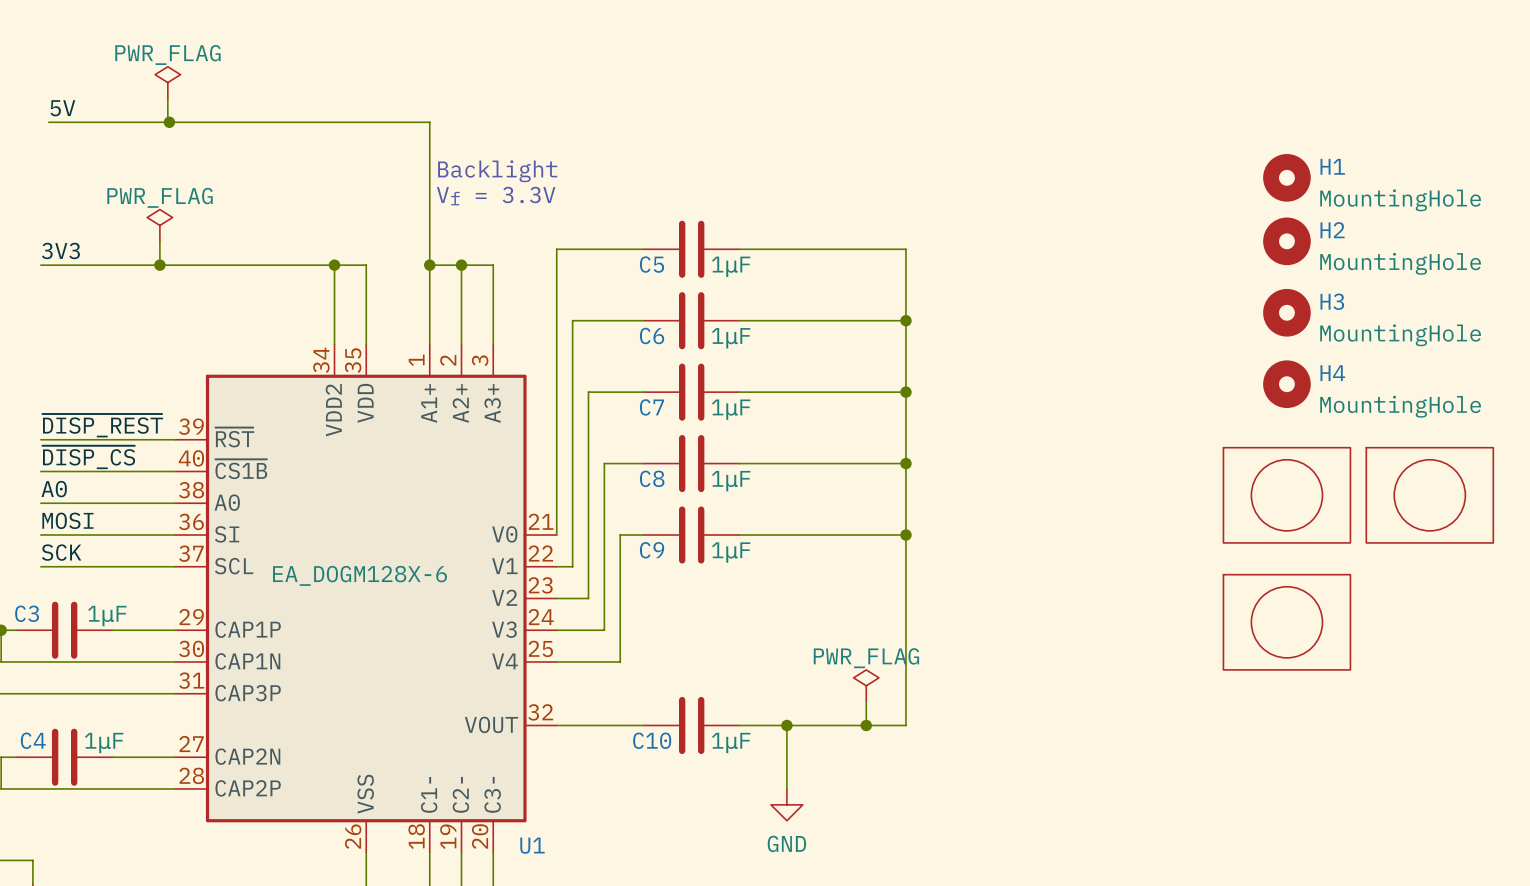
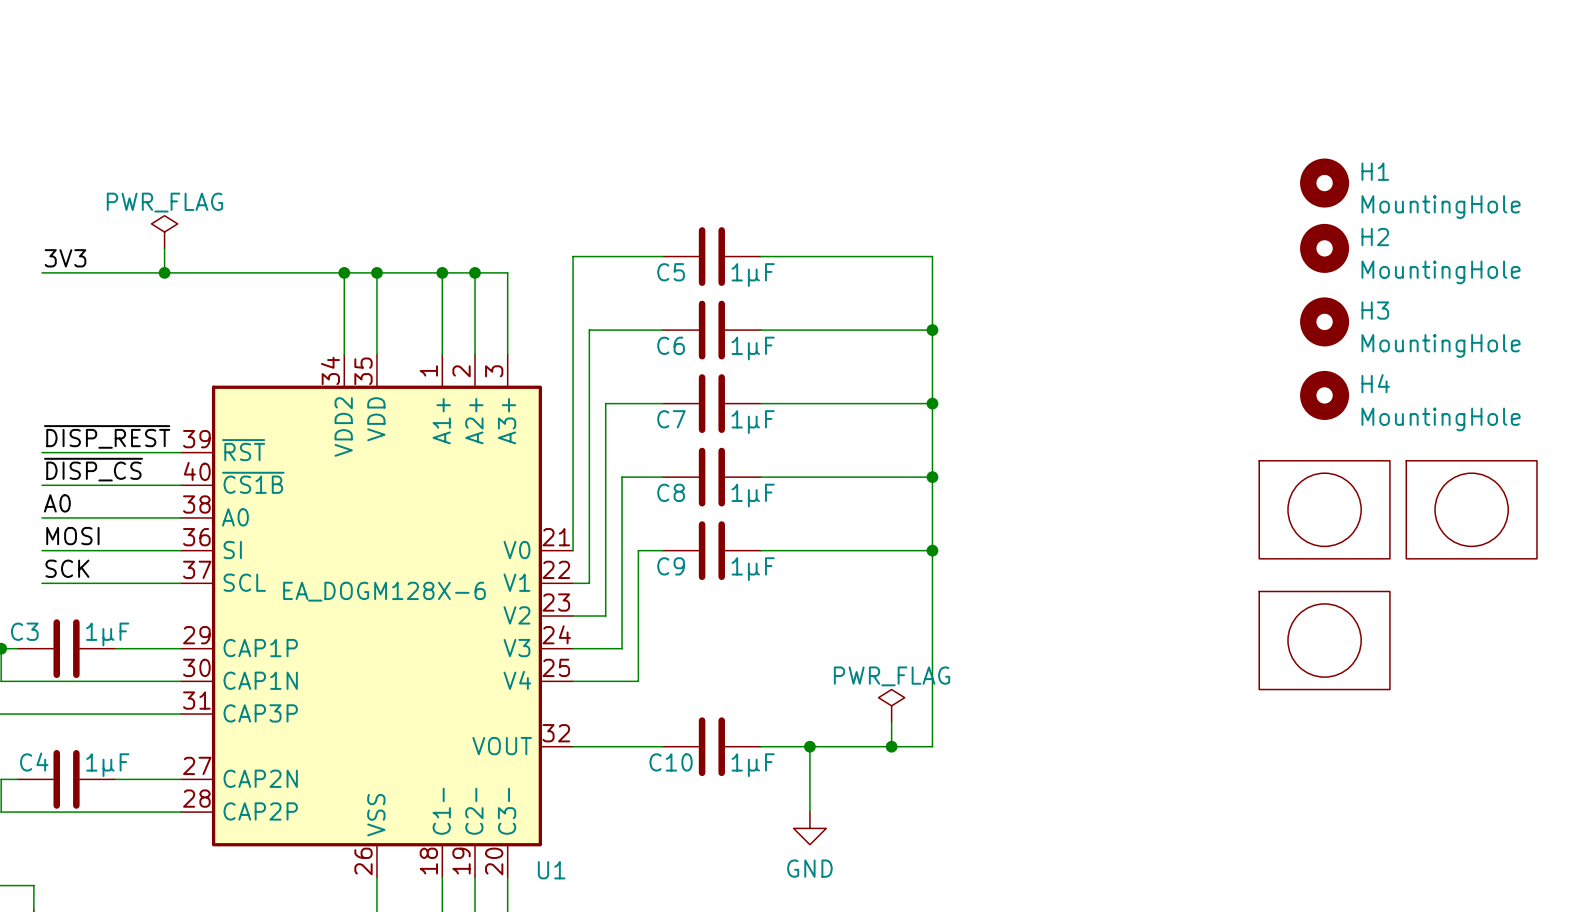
power symbol: PWR_FLAG (167, 82) -> none
wire: (167, 98) (167, 122) (48, 122) -> none
label: 5V (62, 108) -> none
wire: (169, 122) (429, 122) (429, 265) -> (376, 272) (442, 272)
junction: (169, 122) -> none
text: Backlight (497, 171) -> none
text: Vf = 3.3V (496, 196) -> none
junction: none -> (376, 272)

